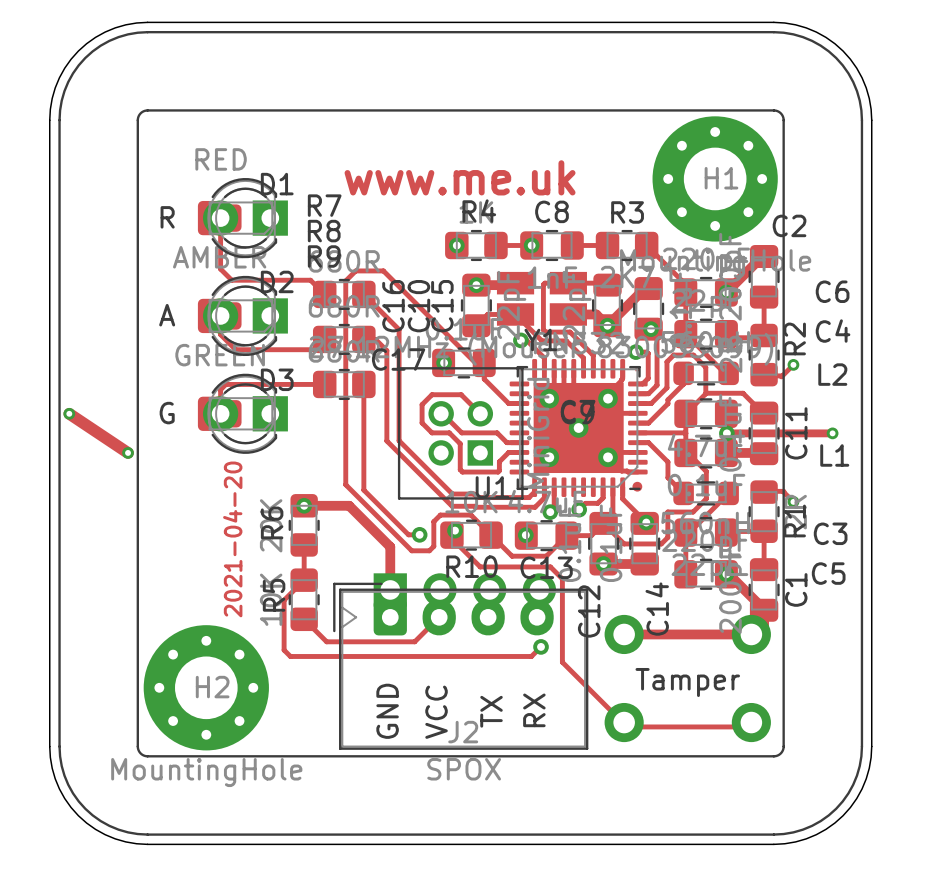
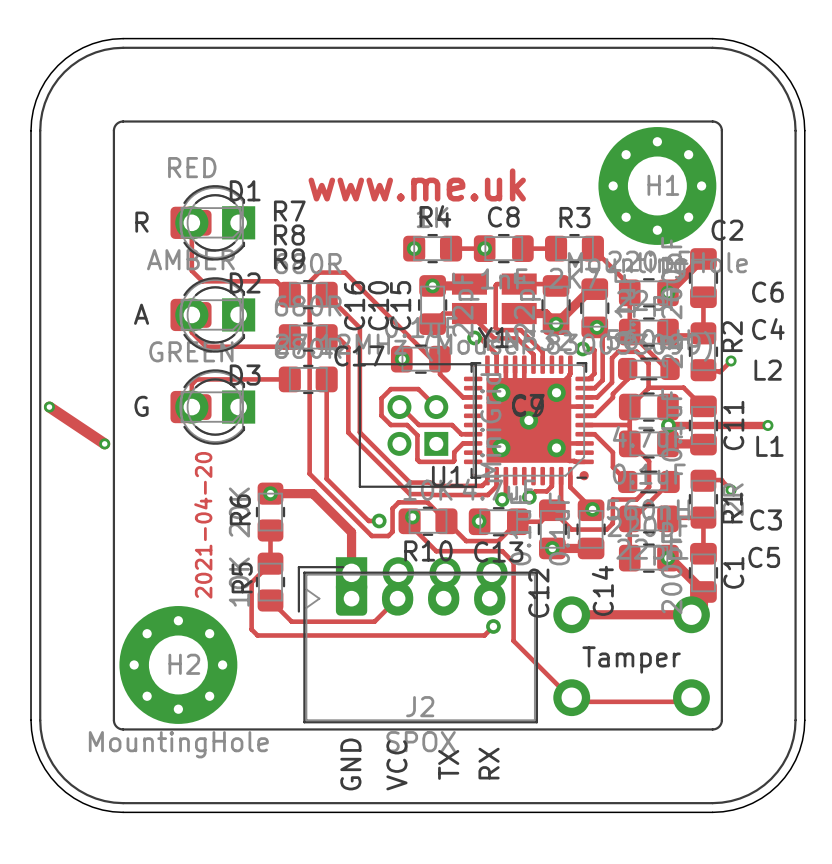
text position: RX (534, 710) -> RX (489, 763)
text position: GND (387, 711) -> GND (350, 764)
text position: TX (491, 711) -> TX (448, 764)
text position: VCC (436, 712) -> VCC (396, 765)

